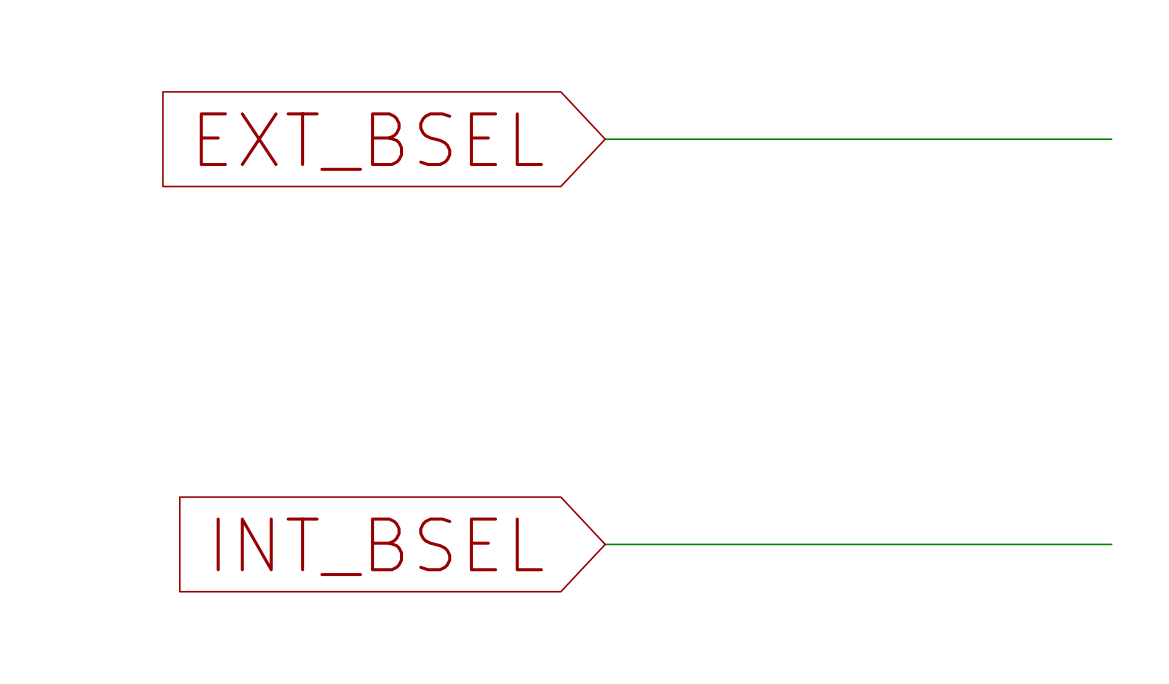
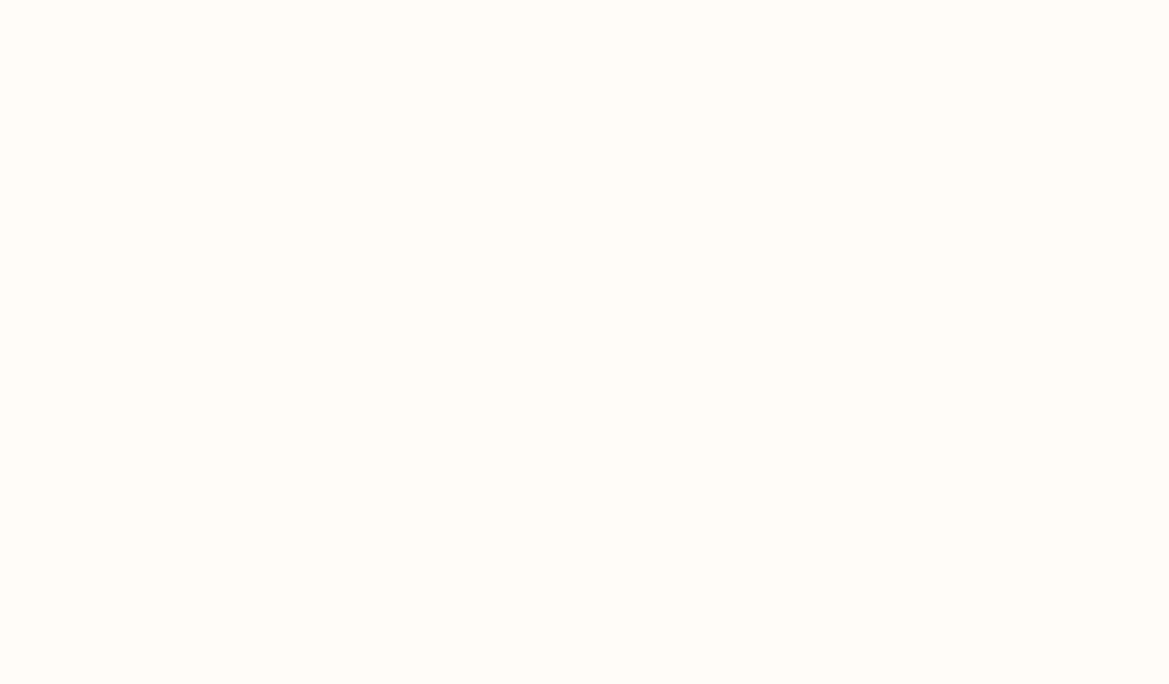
wire: (605, 139) (1111, 139) -> none
global label: EXT_BSEL (371, 141) -> none
wire: (605, 544) (1111, 544) -> none
global label: INT_BSEL (379, 546) -> none

